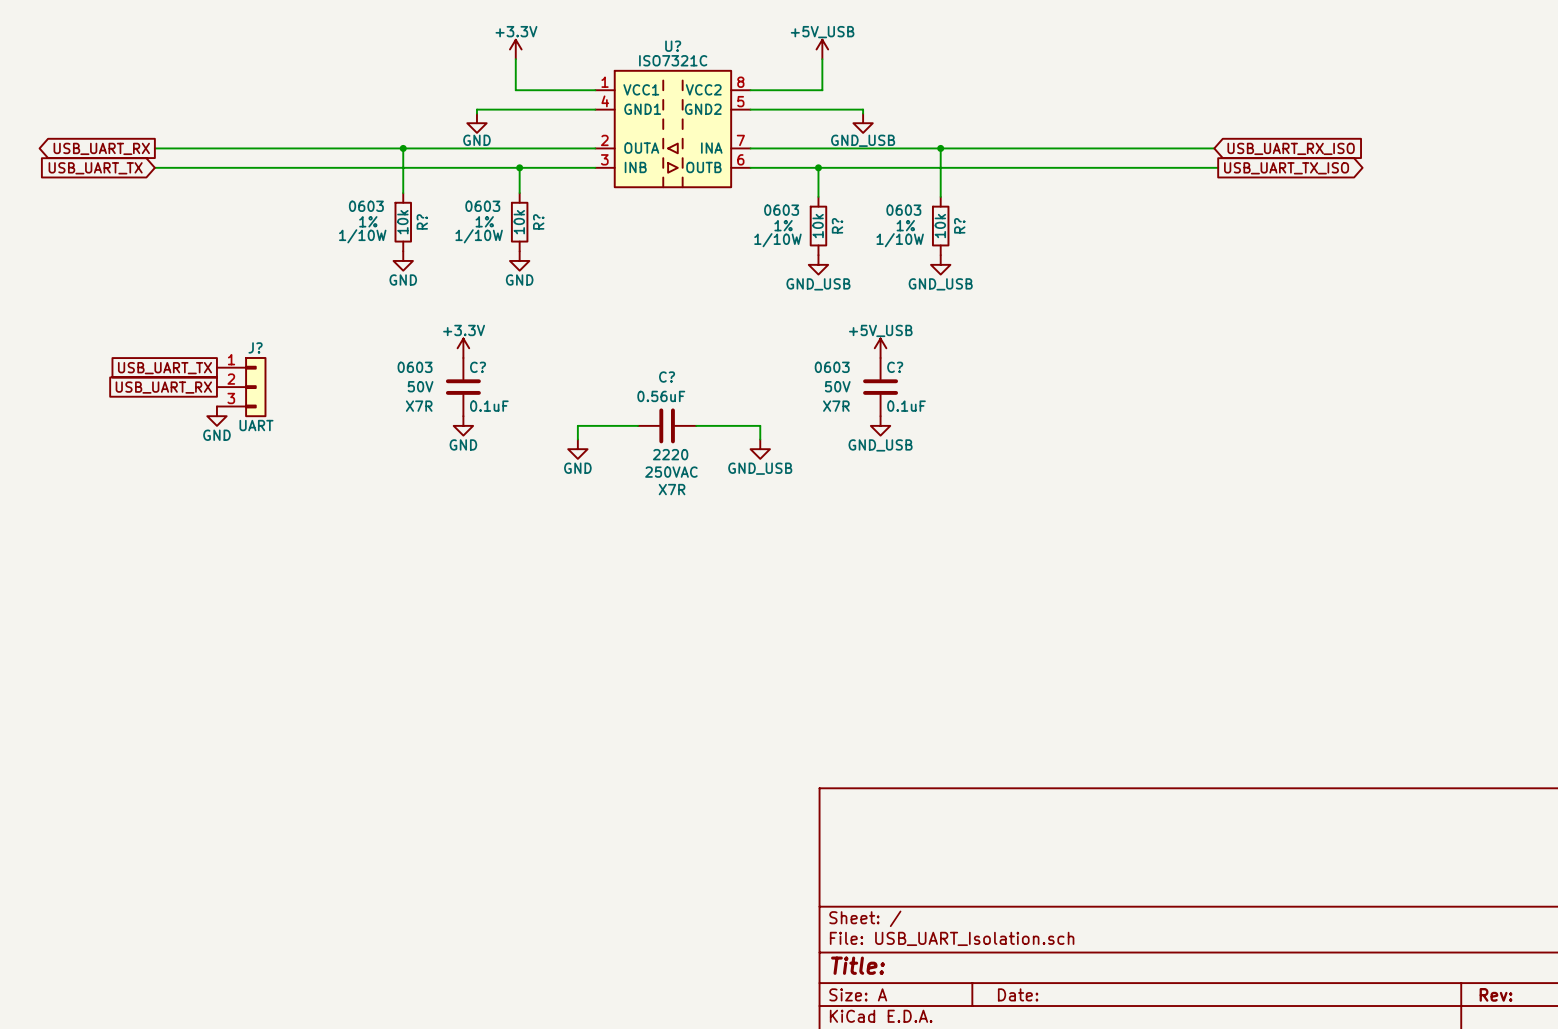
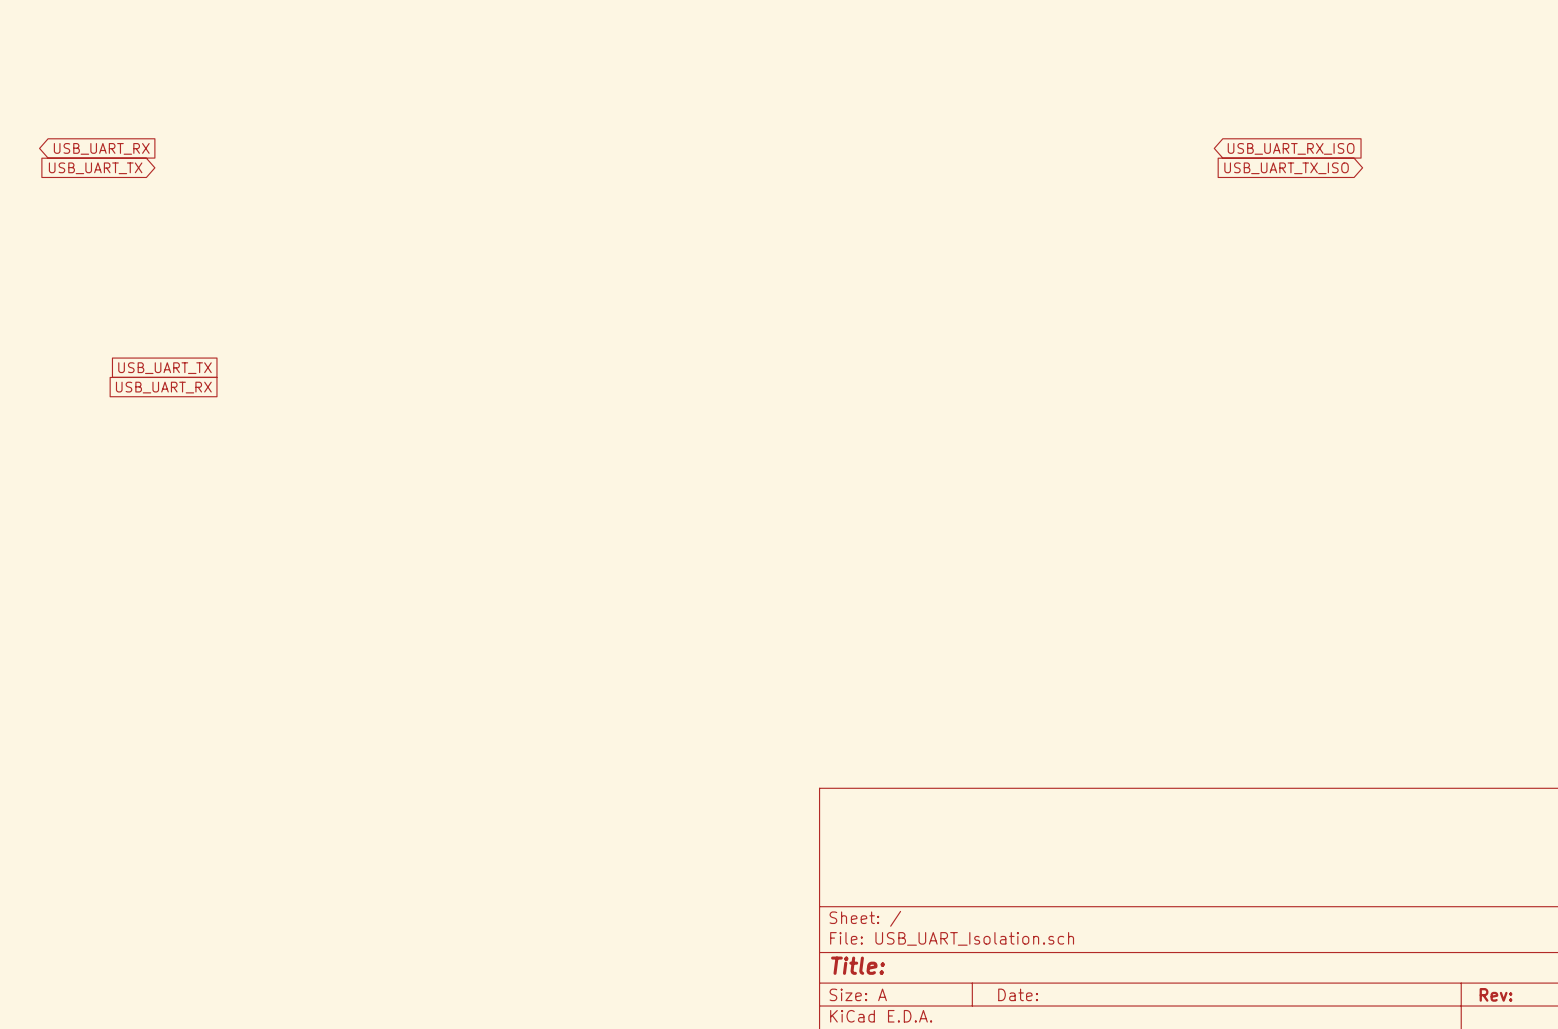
power symbol: +3.3V (515, 49) -> none
power symbol: +5V_USB (822, 49) -> none
wire: (515, 59) (515, 90) (595, 90) -> none
wire: (822, 59) (822, 90) (750, 90) -> none
wire: (595, 109) (476, 109) (476, 113) -> none
wire: (750, 109) (863, 109) (863, 113) -> none
power symbol: GND (476, 123) -> none
power symbol: GND_USB (863, 123) -> none
U?: ISO7321C (672, 129) -> none
wire: (154, 148) (595, 148) -> none
wire: (403, 148) (403, 193) -> none
junction: (403, 148) -> none
wire: (750, 148) (1214, 148) -> none
wire: (940, 148) (940, 196) -> none
junction: (940, 148) -> none
wire: (154, 167) (595, 167) -> none
wire: (519, 167) (519, 193) -> none
junction: (519, 167) -> none
wire: (750, 167) (1218, 167) -> none
wire: (818, 167) (818, 196) -> none
junction: (818, 167) -> none
R?: 10k (403, 222) -> none
R?: 10k (519, 222) -> none
R?: 10k (818, 226) -> none
R?: 10k (940, 226) -> none
power symbol: GND (403, 260) -> none
power symbol: GND (519, 260) -> none
power symbol: GND_USB (818, 264) -> none
power symbol: GND_USB (940, 264) -> none
power symbol: +3.3V (463, 348) -> none
power symbol: +5V_USB (880, 348) -> none
J?: UART (241, 387) -> none
C?: 0.1uF (463, 387) -> none
C?: 0.1uF (880, 387) -> none
power symbol: GND (216, 416) -> none
power symbol: GND (463, 425) -> none
wire: (638, 425) (577, 425) (577, 439) -> none
C?: 0.56uF (667, 425) -> none
wire: (696, 425) (760, 425) (760, 439) -> none
power symbol: GND_USB (880, 425) -> none
power symbol: GND (577, 449) -> none
power symbol: GND_USB (760, 449) -> none

